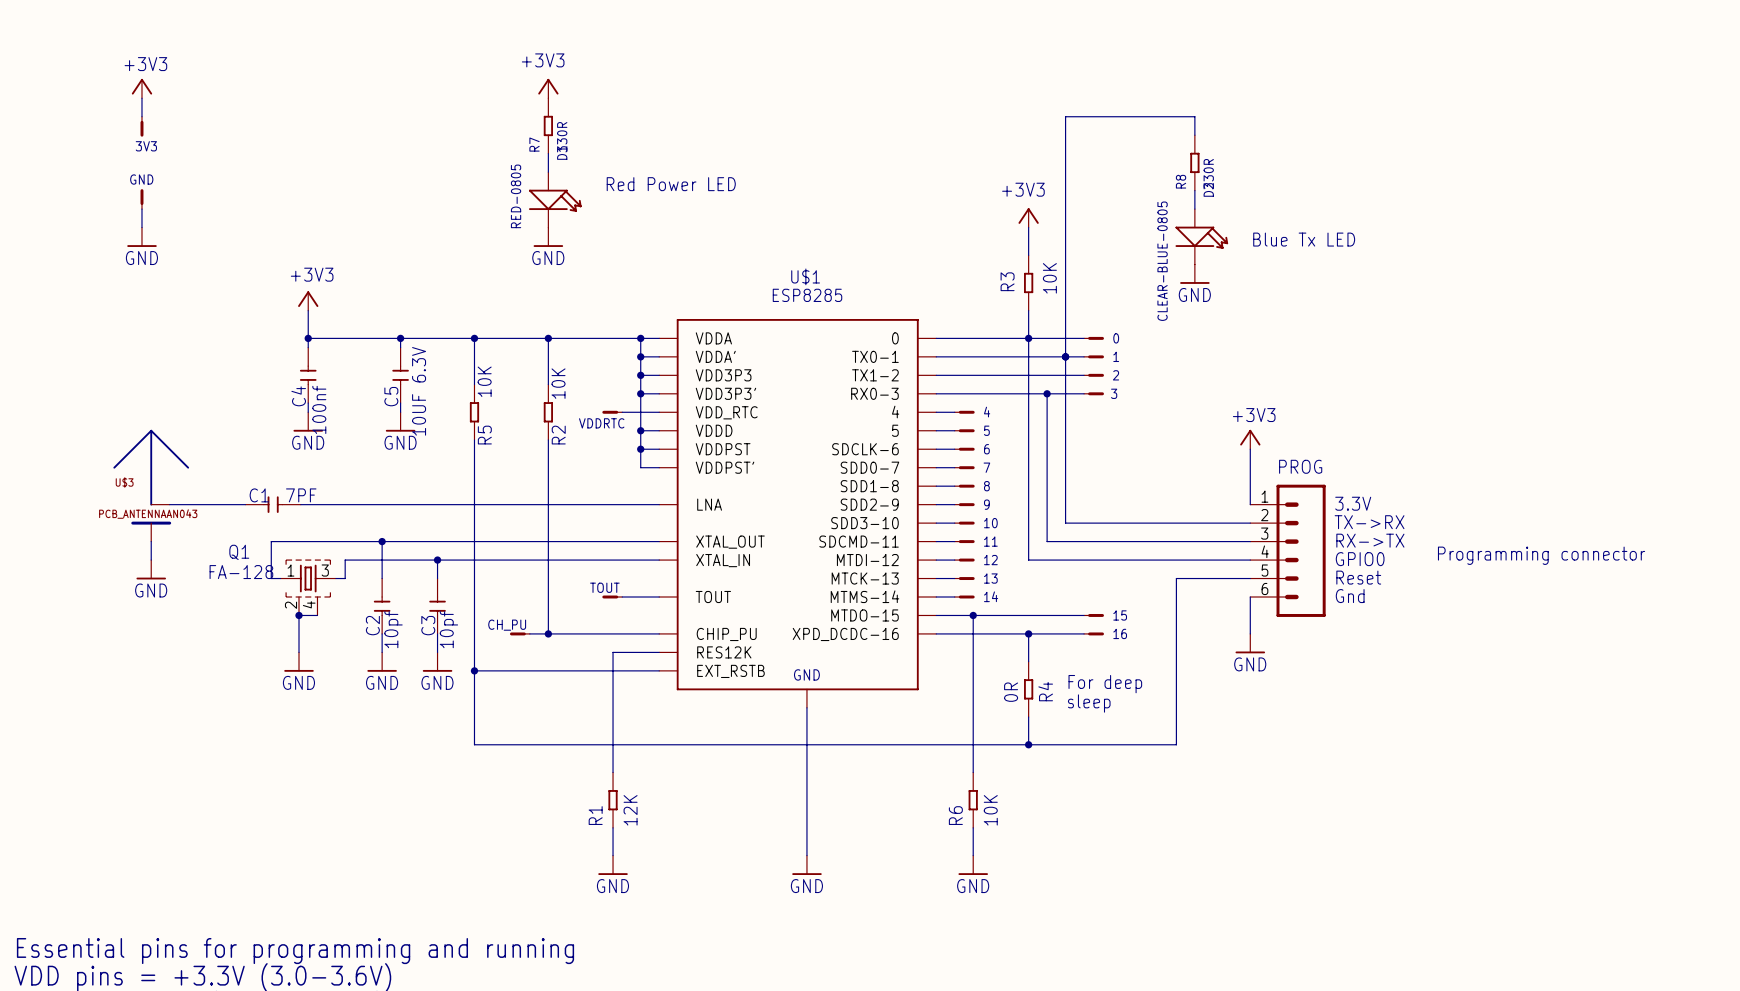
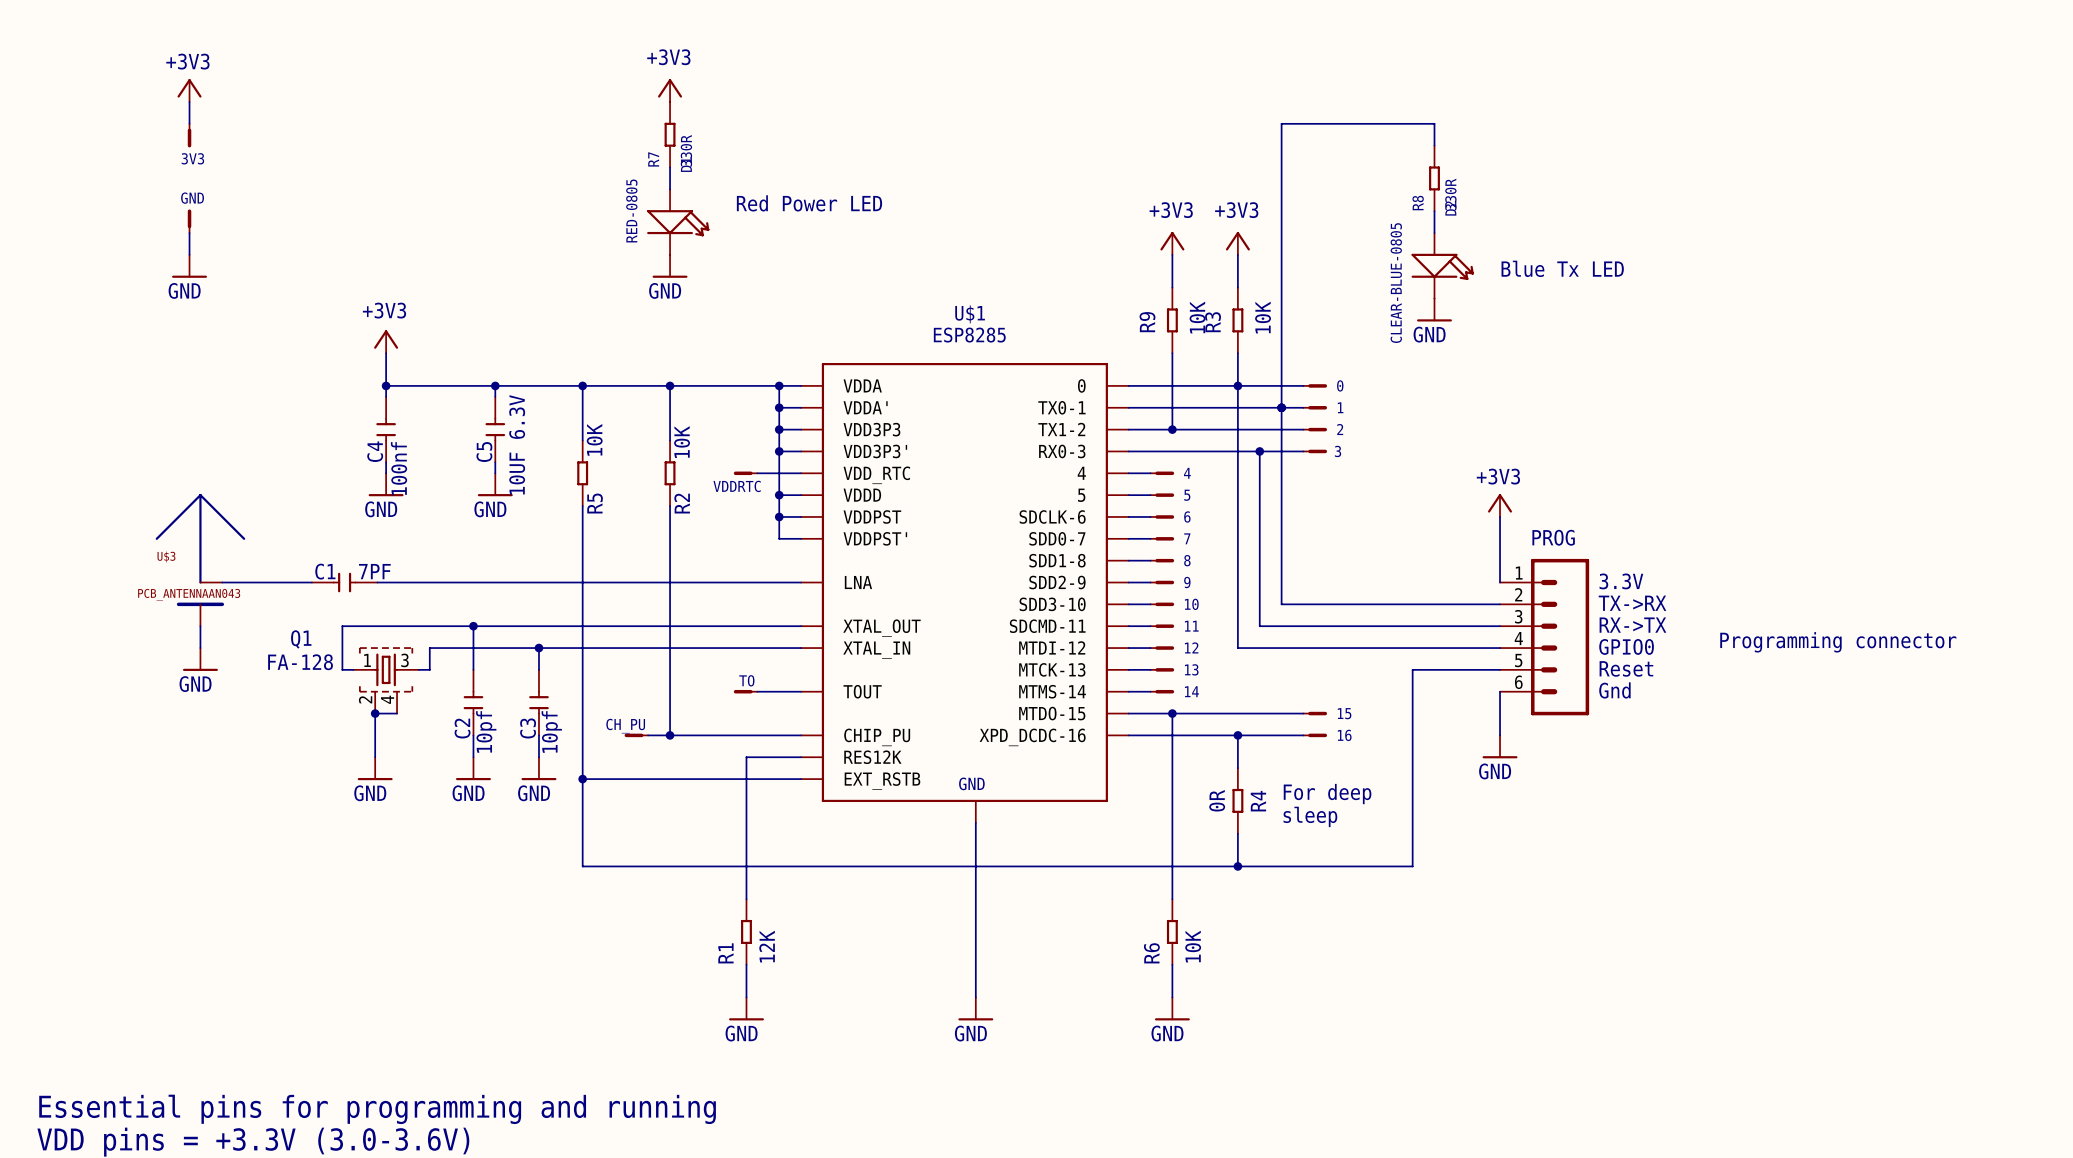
power symbol: none -> +3V3 (1172, 243)
wire: none -> (1172, 254) (1172, 287)
R9: none -> 10K (1172, 320)
wire: none -> (1172, 353) (1172, 429)
junction: none -> (1172, 429)
TOUT name: TOUT (604, 587) -> TO (746, 680)

